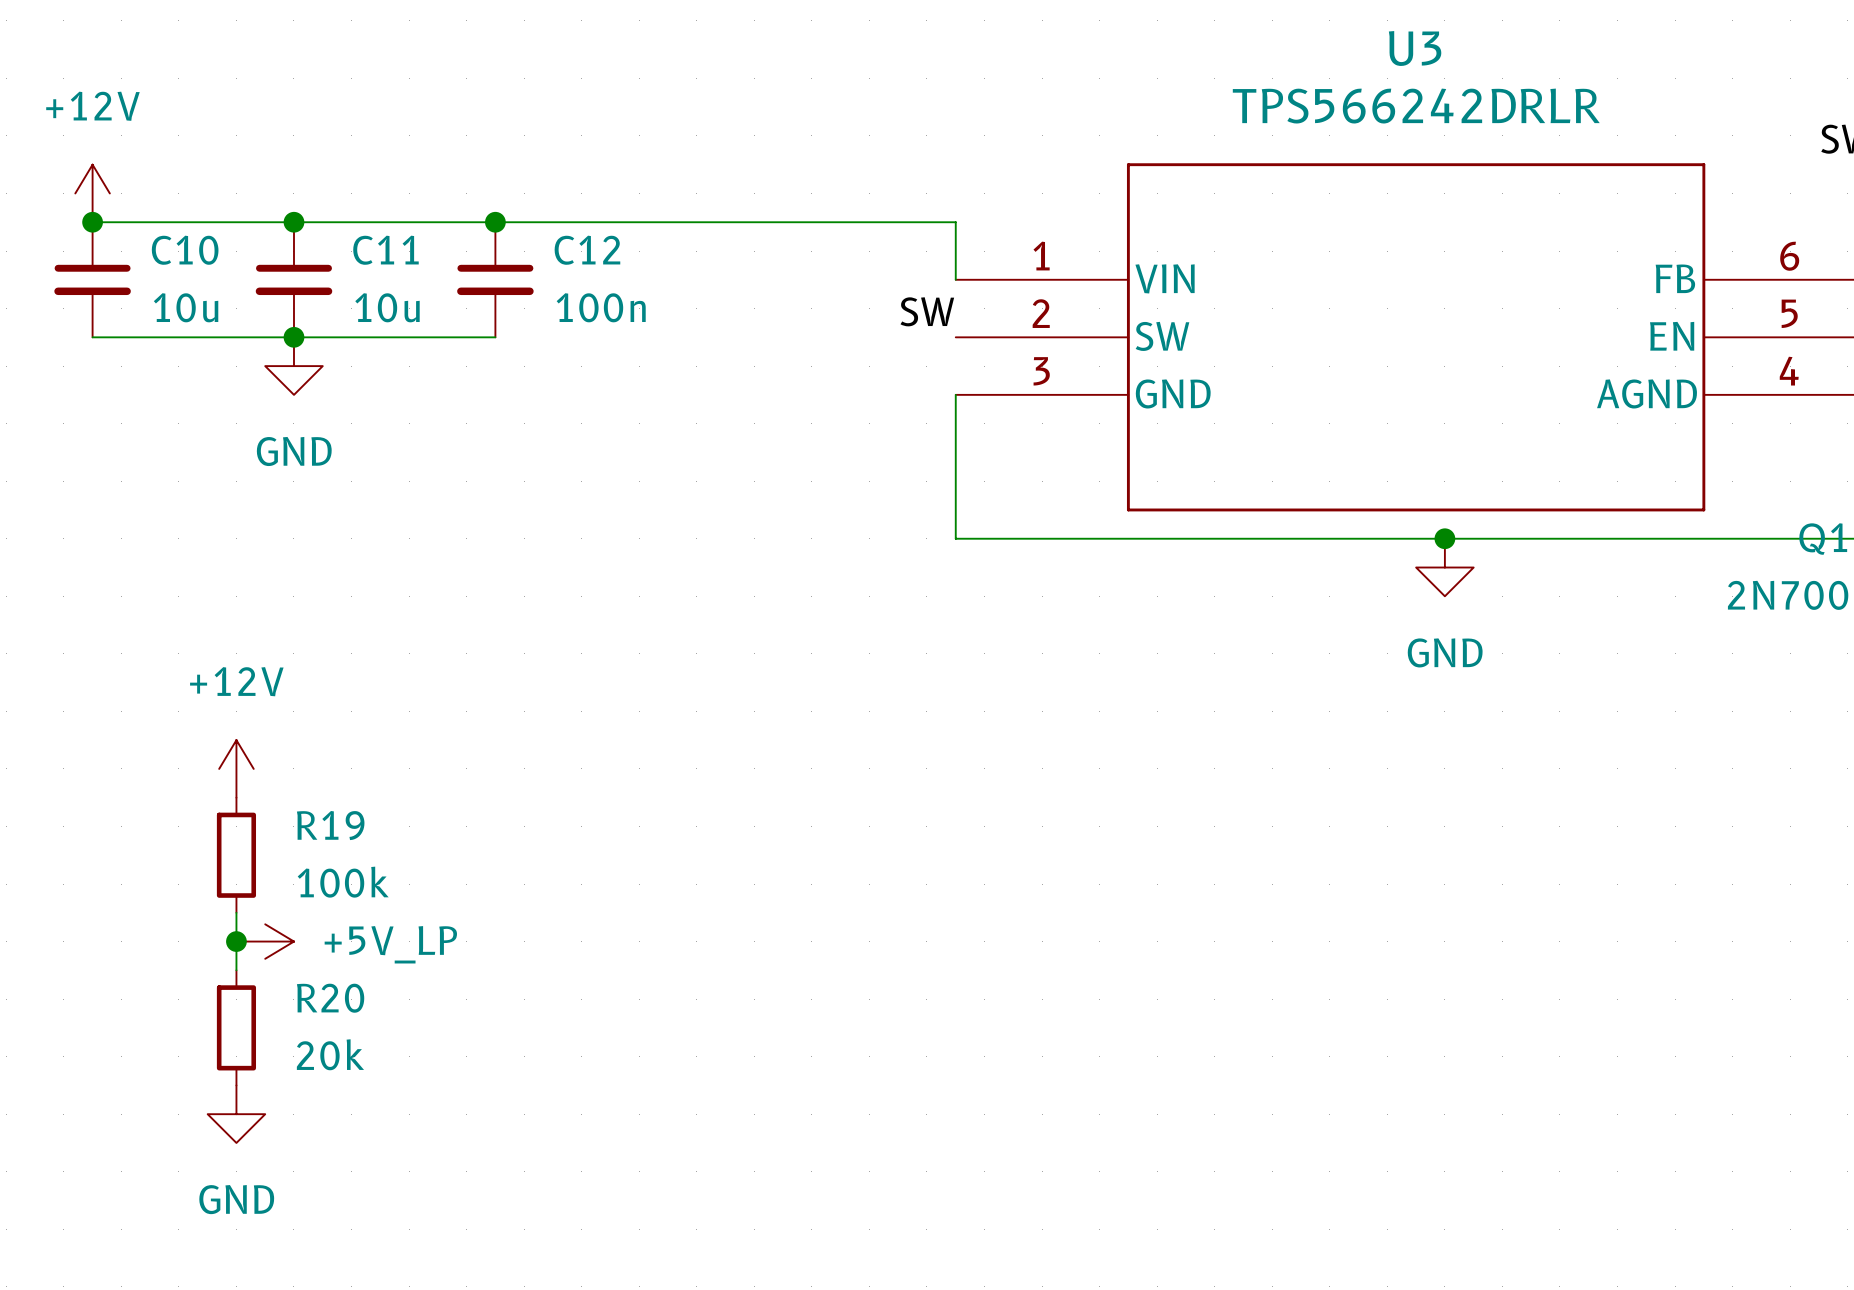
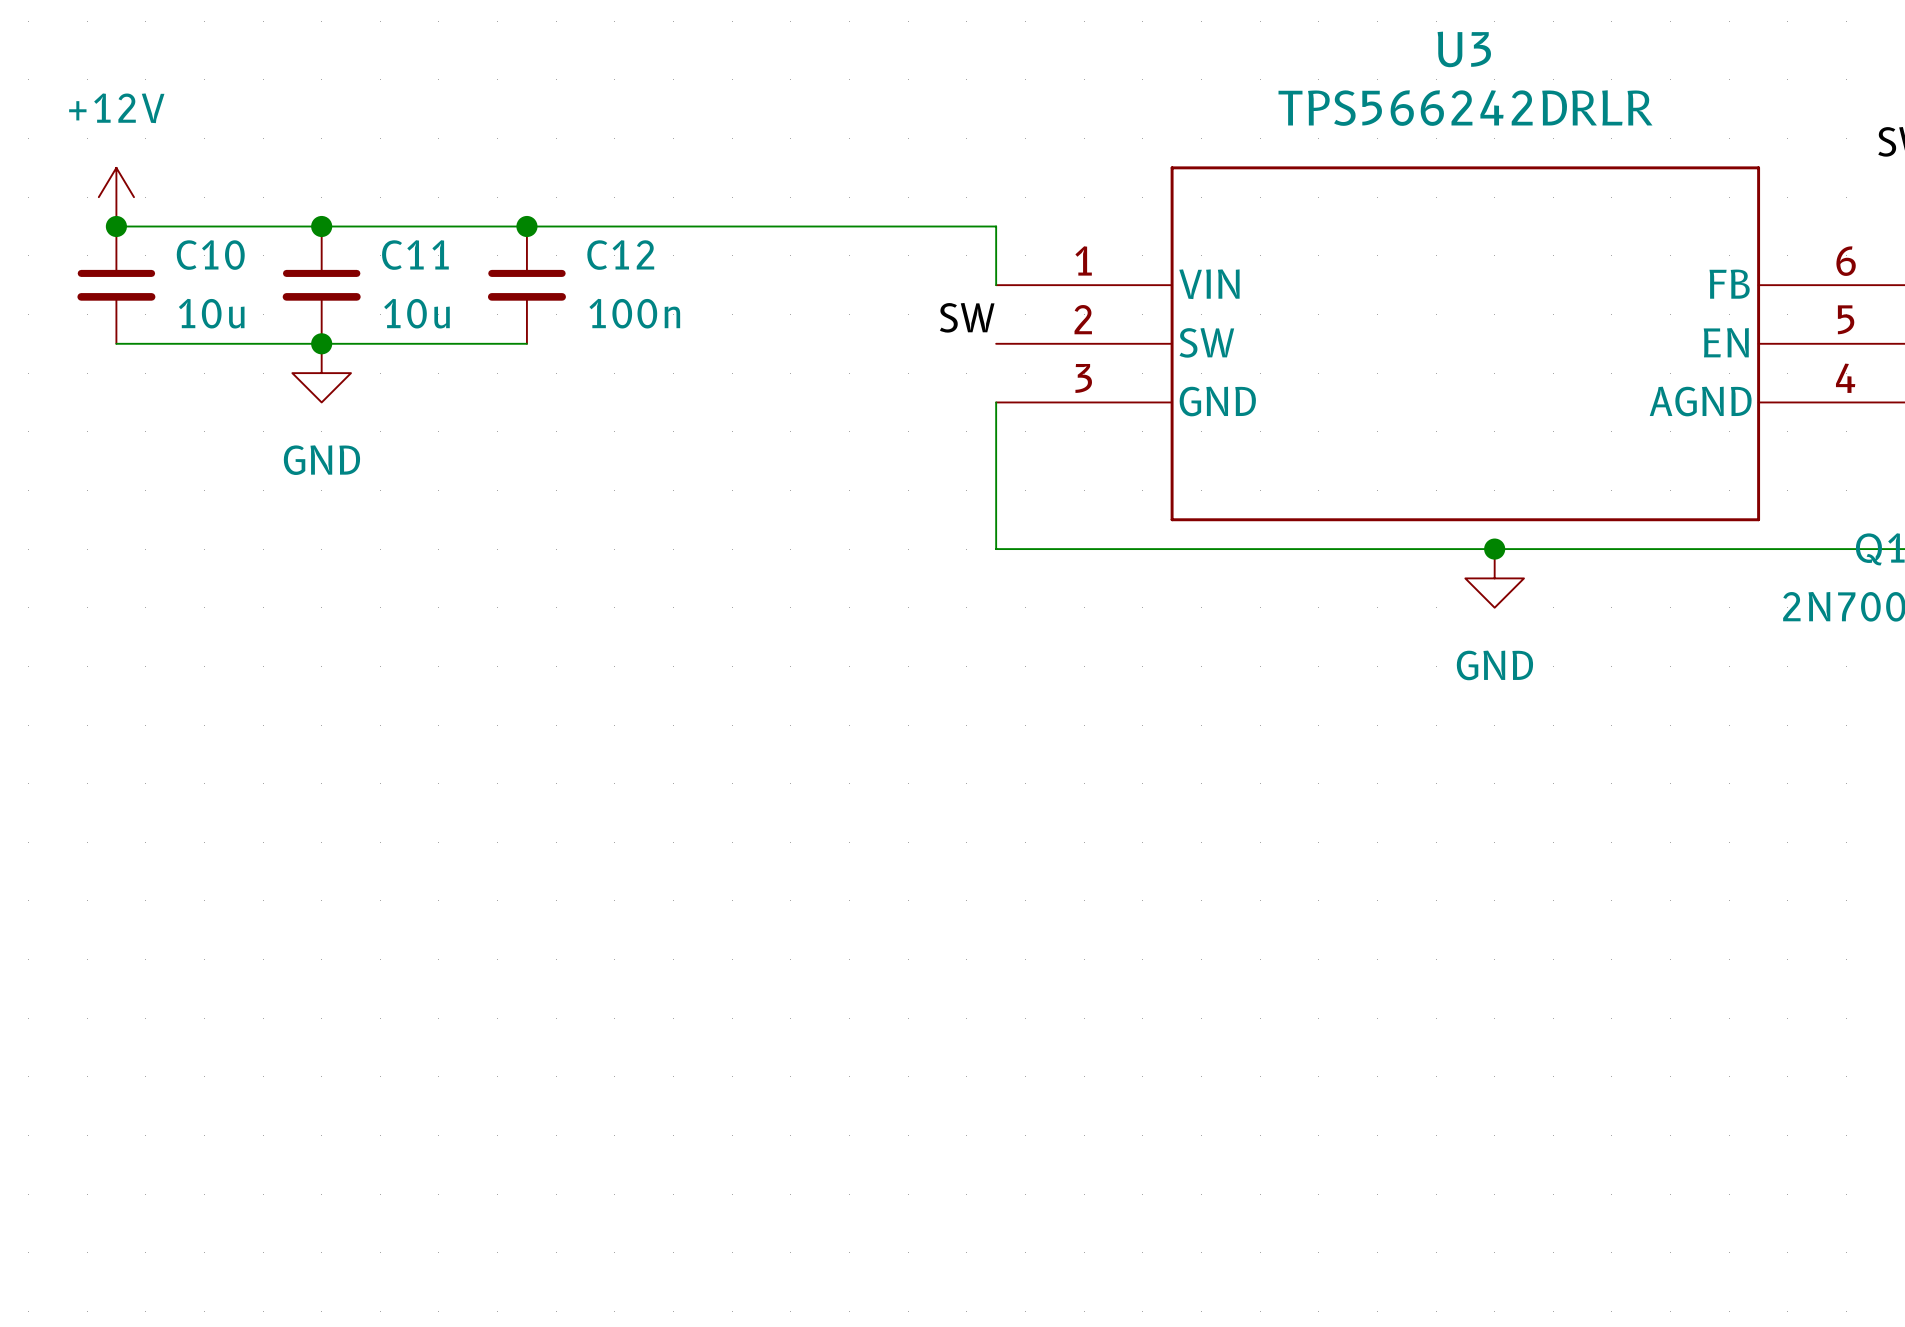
power symbol: +12V (236, 768) -> none
R19: 100k (236, 855) -> none
wire: (236, 912) (236, 970) -> none
junction: (236, 941) -> none
power symbol: +5V_LP (265, 941) -> none
R20: 20k (236, 1027) -> none
power symbol: GND (236, 1114) -> none

